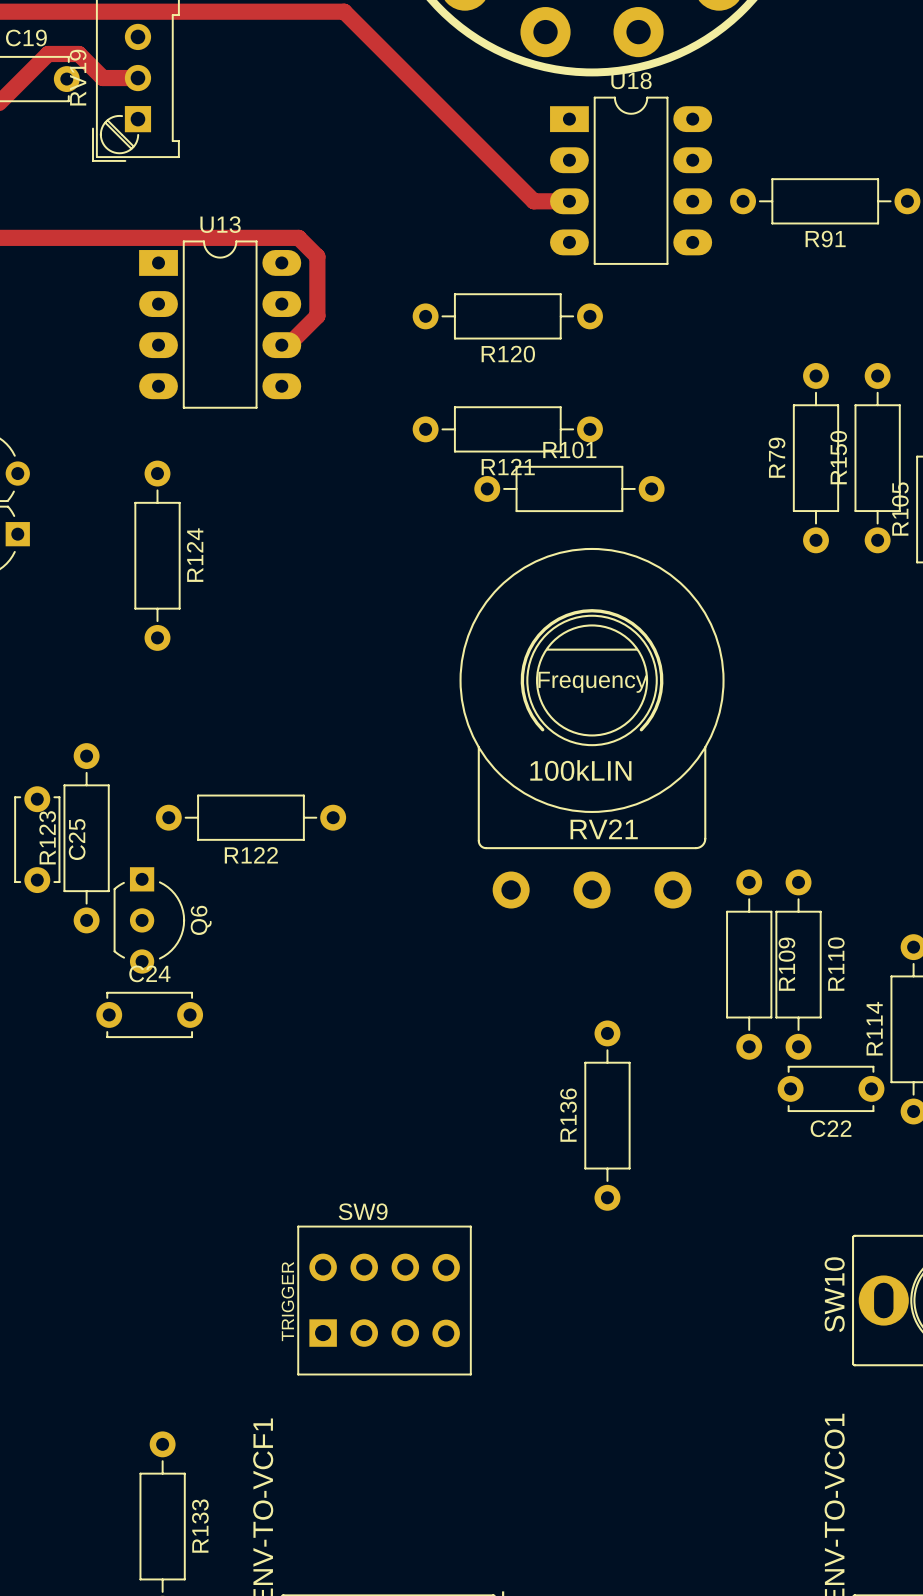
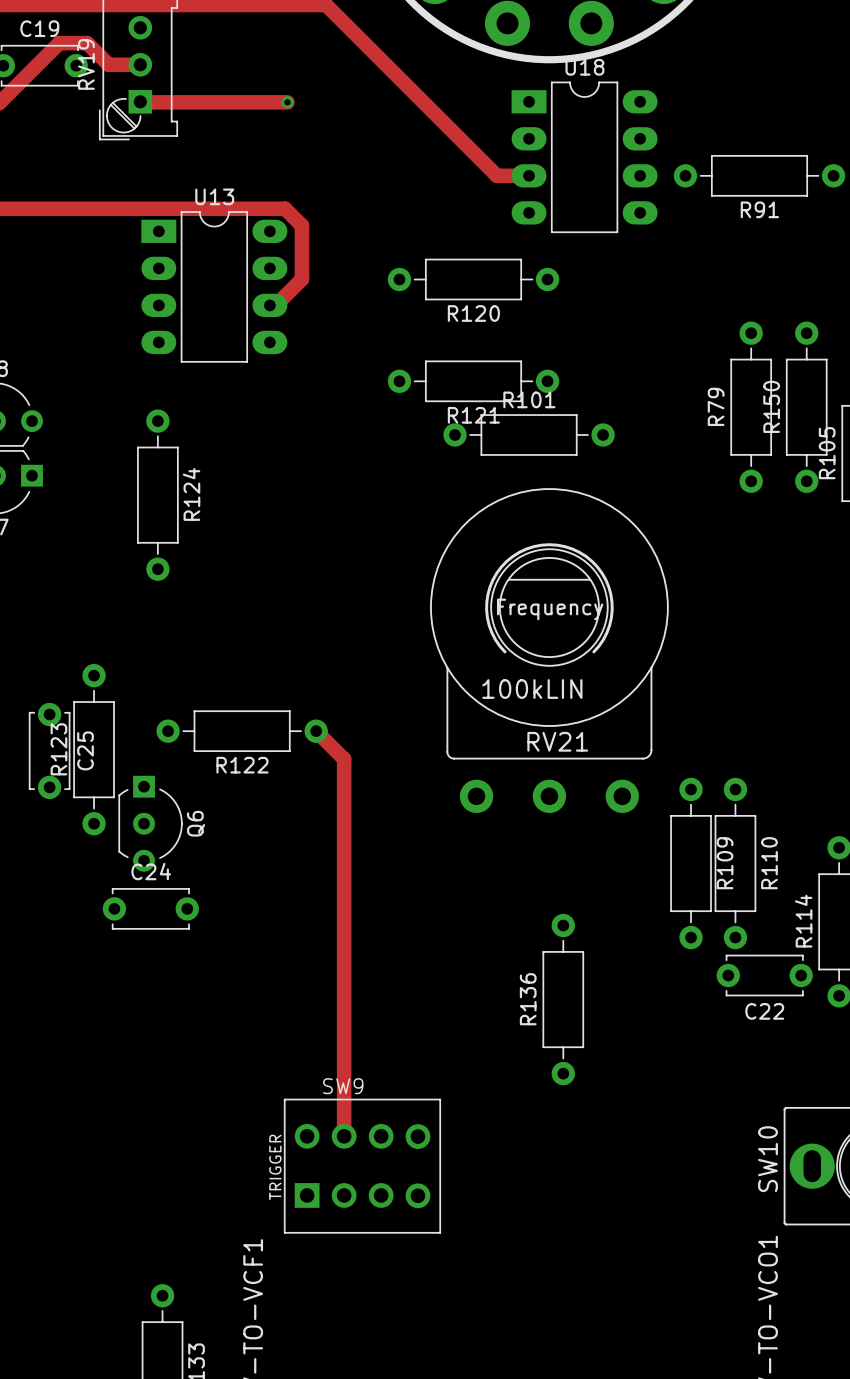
track: none -> (140, 101) (287, 102)
via: none -> (287, 102)
track: none -> (316, 731) (344, 759) (344, 1136)

